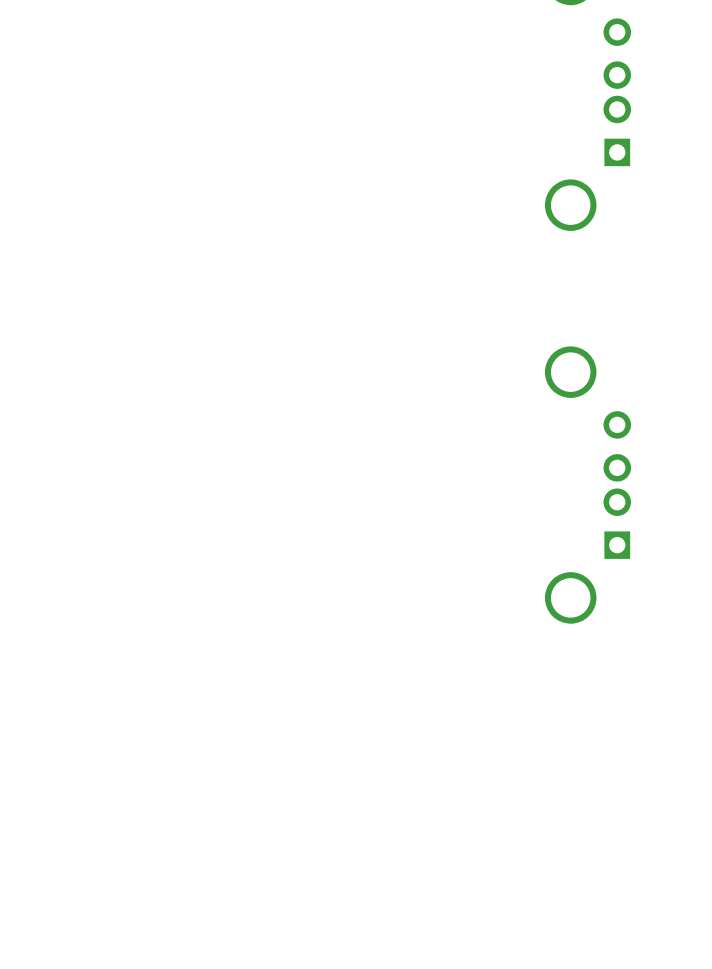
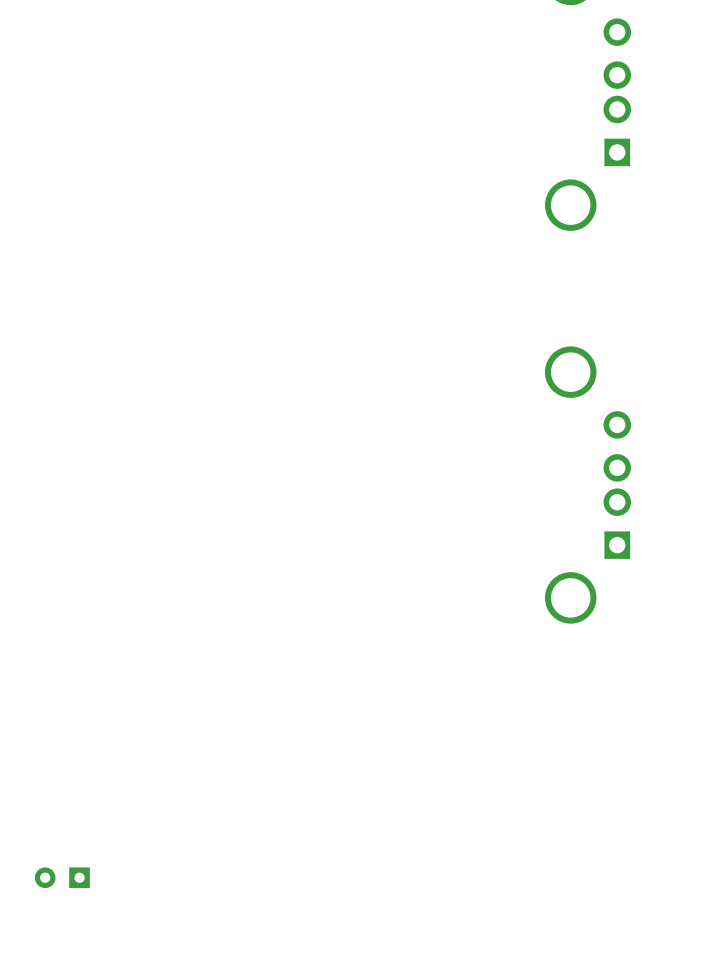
part: none -> (62, 877)

